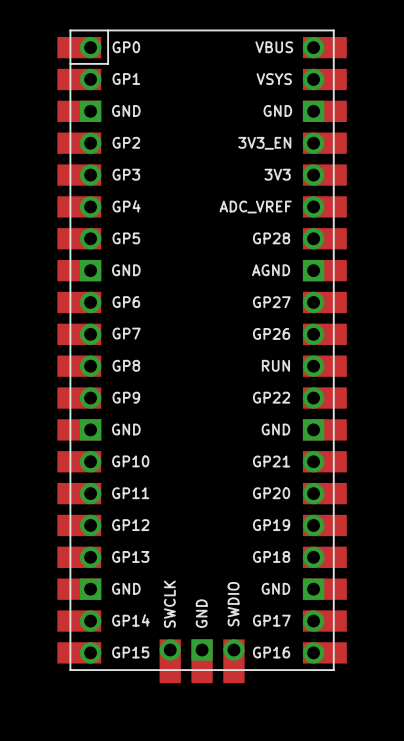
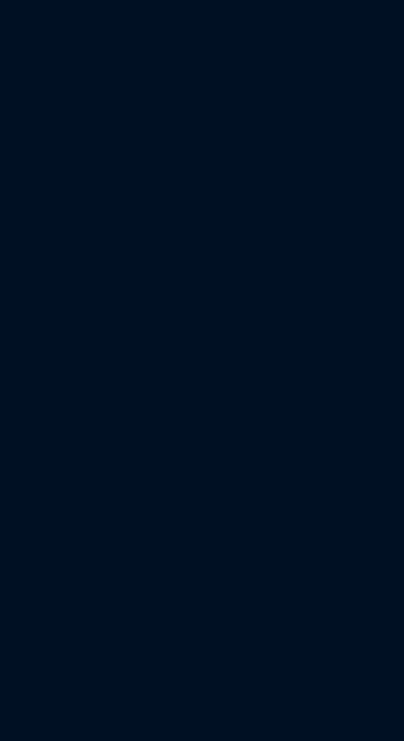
part: (202, 356) -> none

